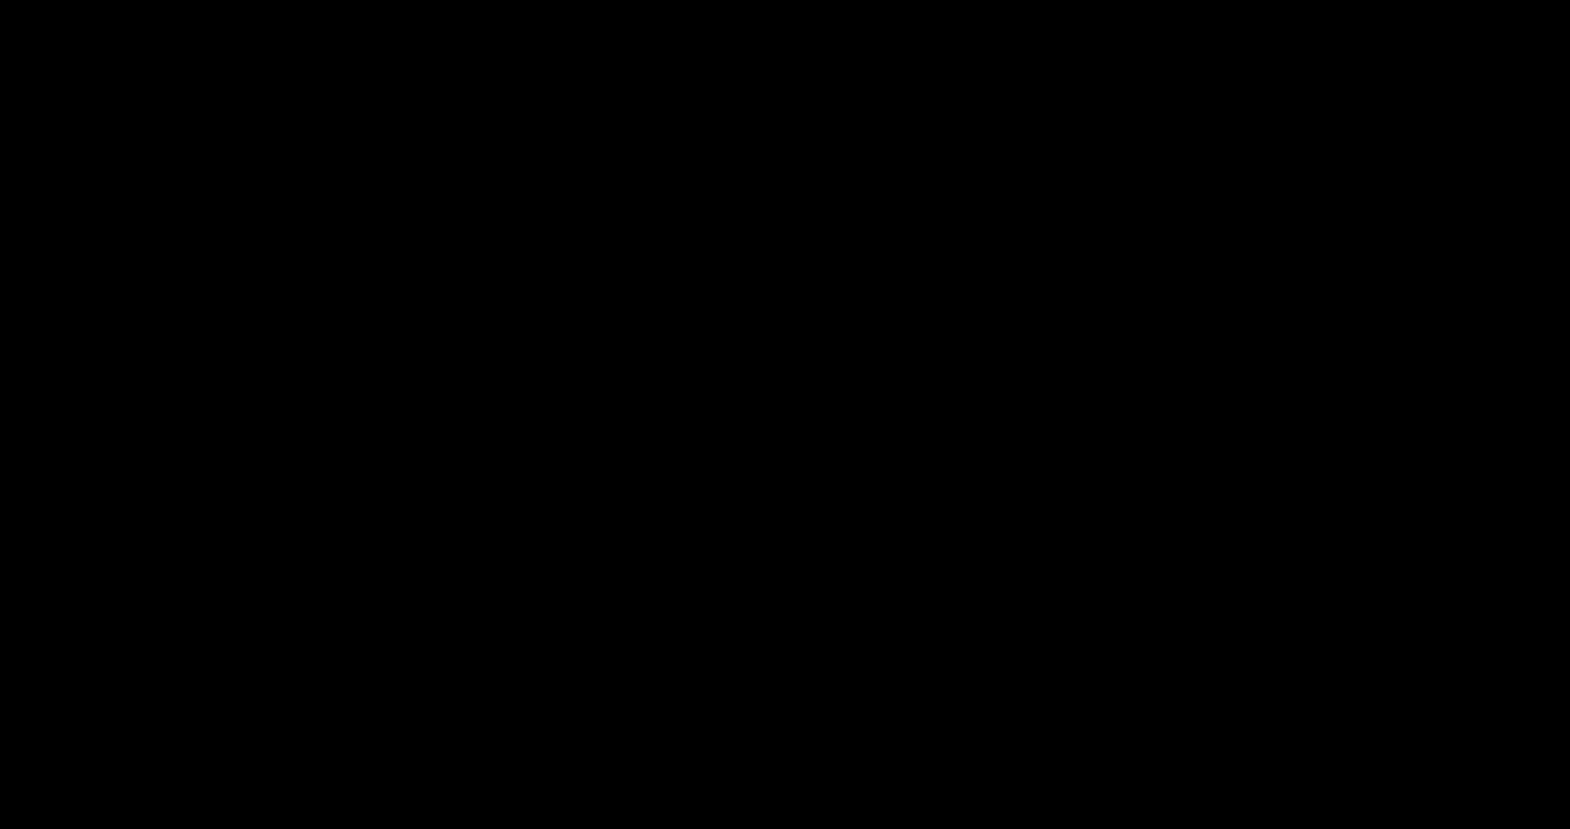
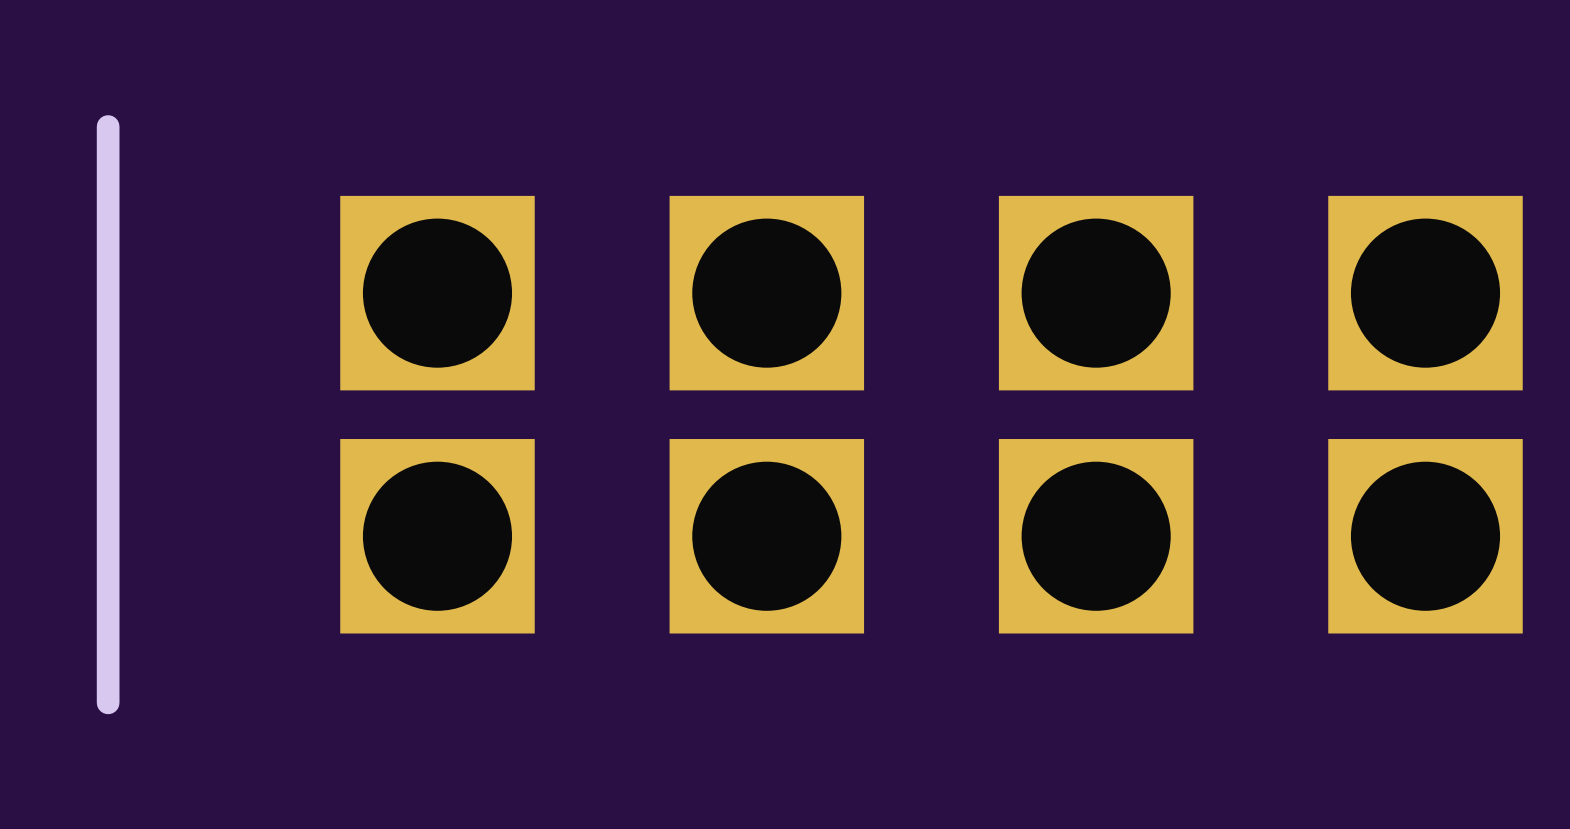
board edge: none -> (108, 126) (108, 702)
part: none -> (437, 414)
part: none -> (766, 414)
part: none -> (1096, 414)
part: none -> (1425, 414)

